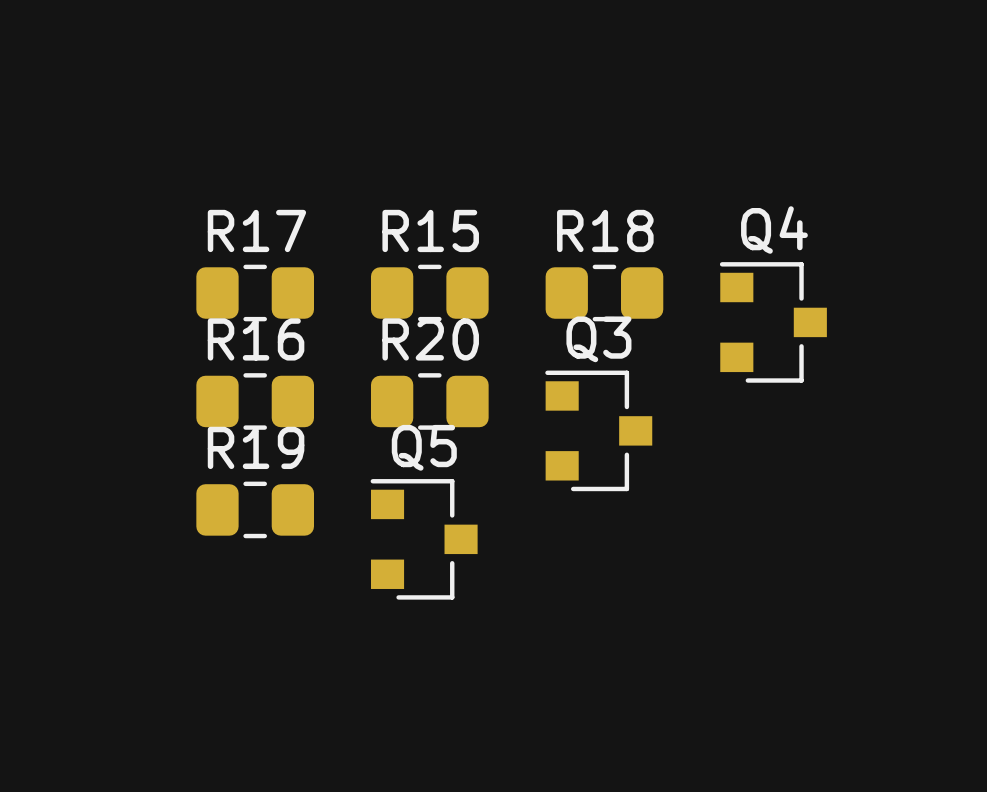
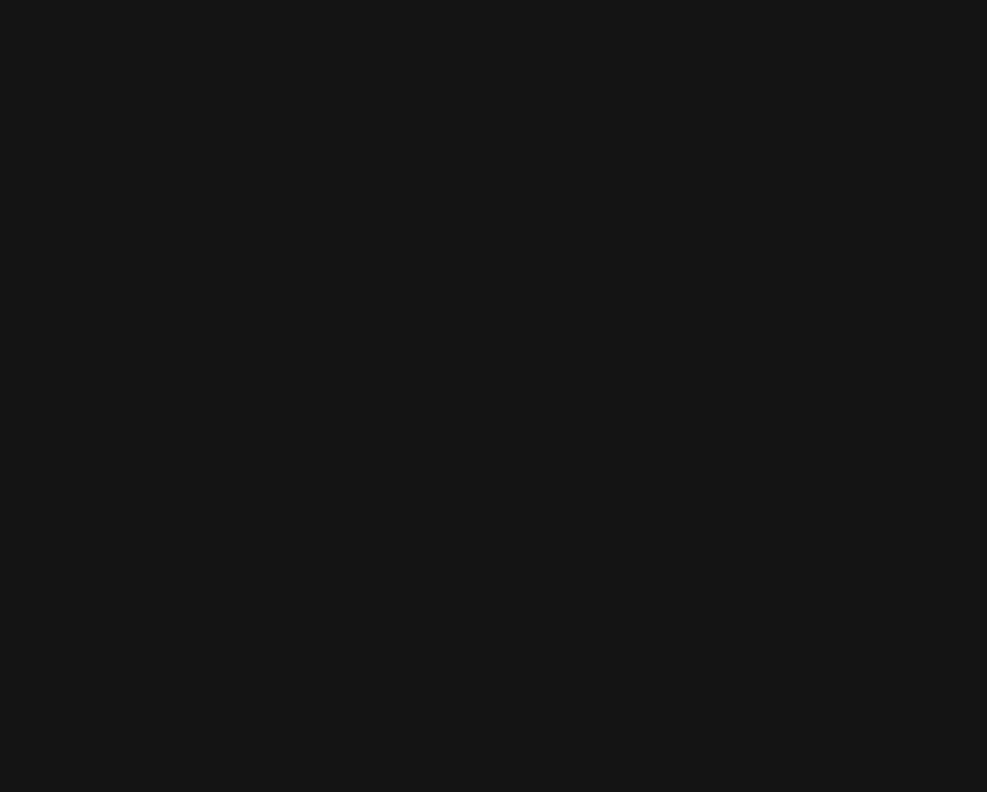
R17: (255, 293) -> none
R15: (429, 293) -> none
R18: (604, 293) -> none
Q4: (773, 322) -> none
R16: (255, 401) -> none
R20: (429, 401) -> none
Q3: (598, 430) -> none
R19: (255, 509) -> none
Q5: (424, 539) -> none

